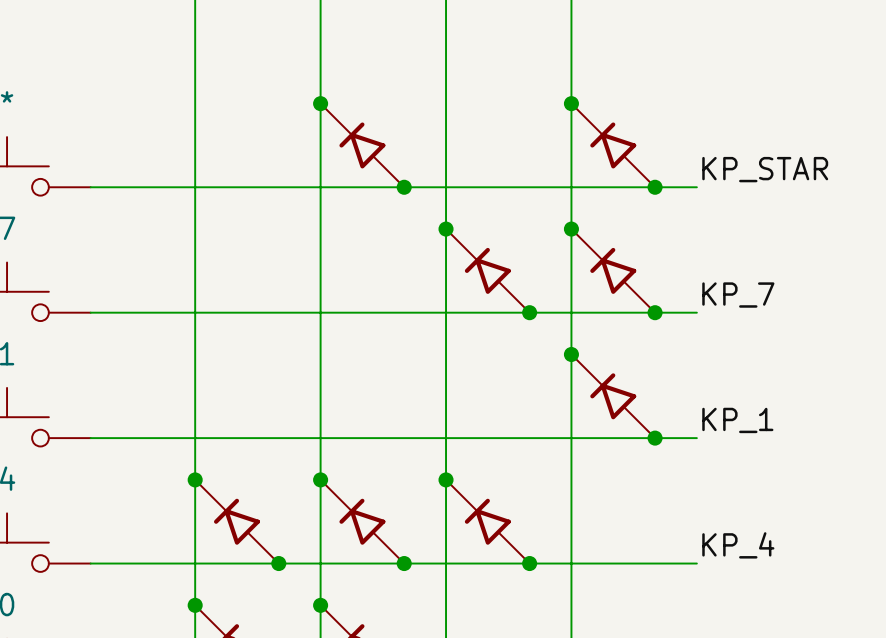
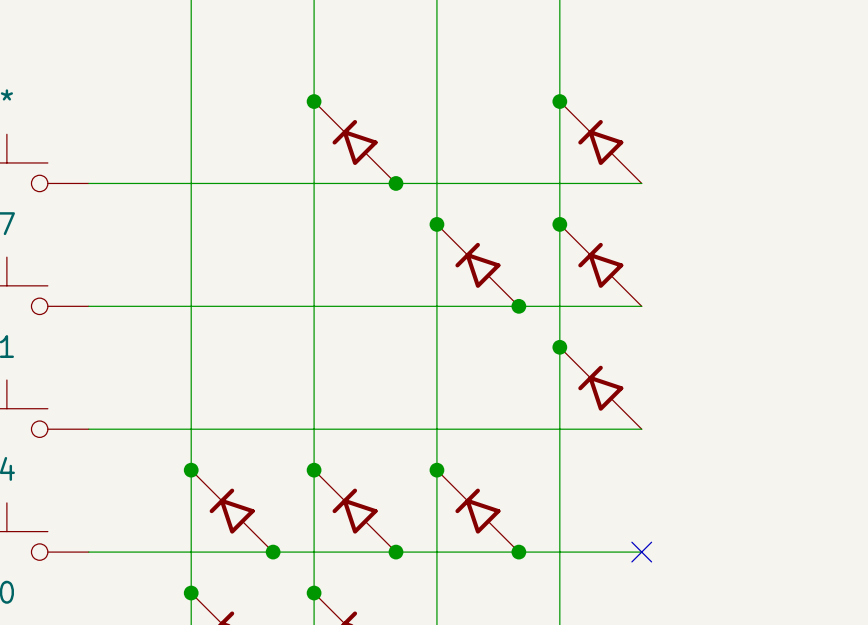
label: KP_STAR (765, 169) -> none
wire: (655, 187) (696, 187) -> none
junction: (655, 187) -> none
label: KP_7 (738, 295) -> none
wire: (655, 312) (696, 312) -> none
junction: (655, 312) -> none
label: KP_1 (737, 420) -> none
wire: (655, 438) (696, 438) -> none
junction: (655, 438) -> none
label: KP_4 (738, 545) -> none
wire: (655, 563) (696, 563) -> none
no-connect mark: none -> (641, 552)

